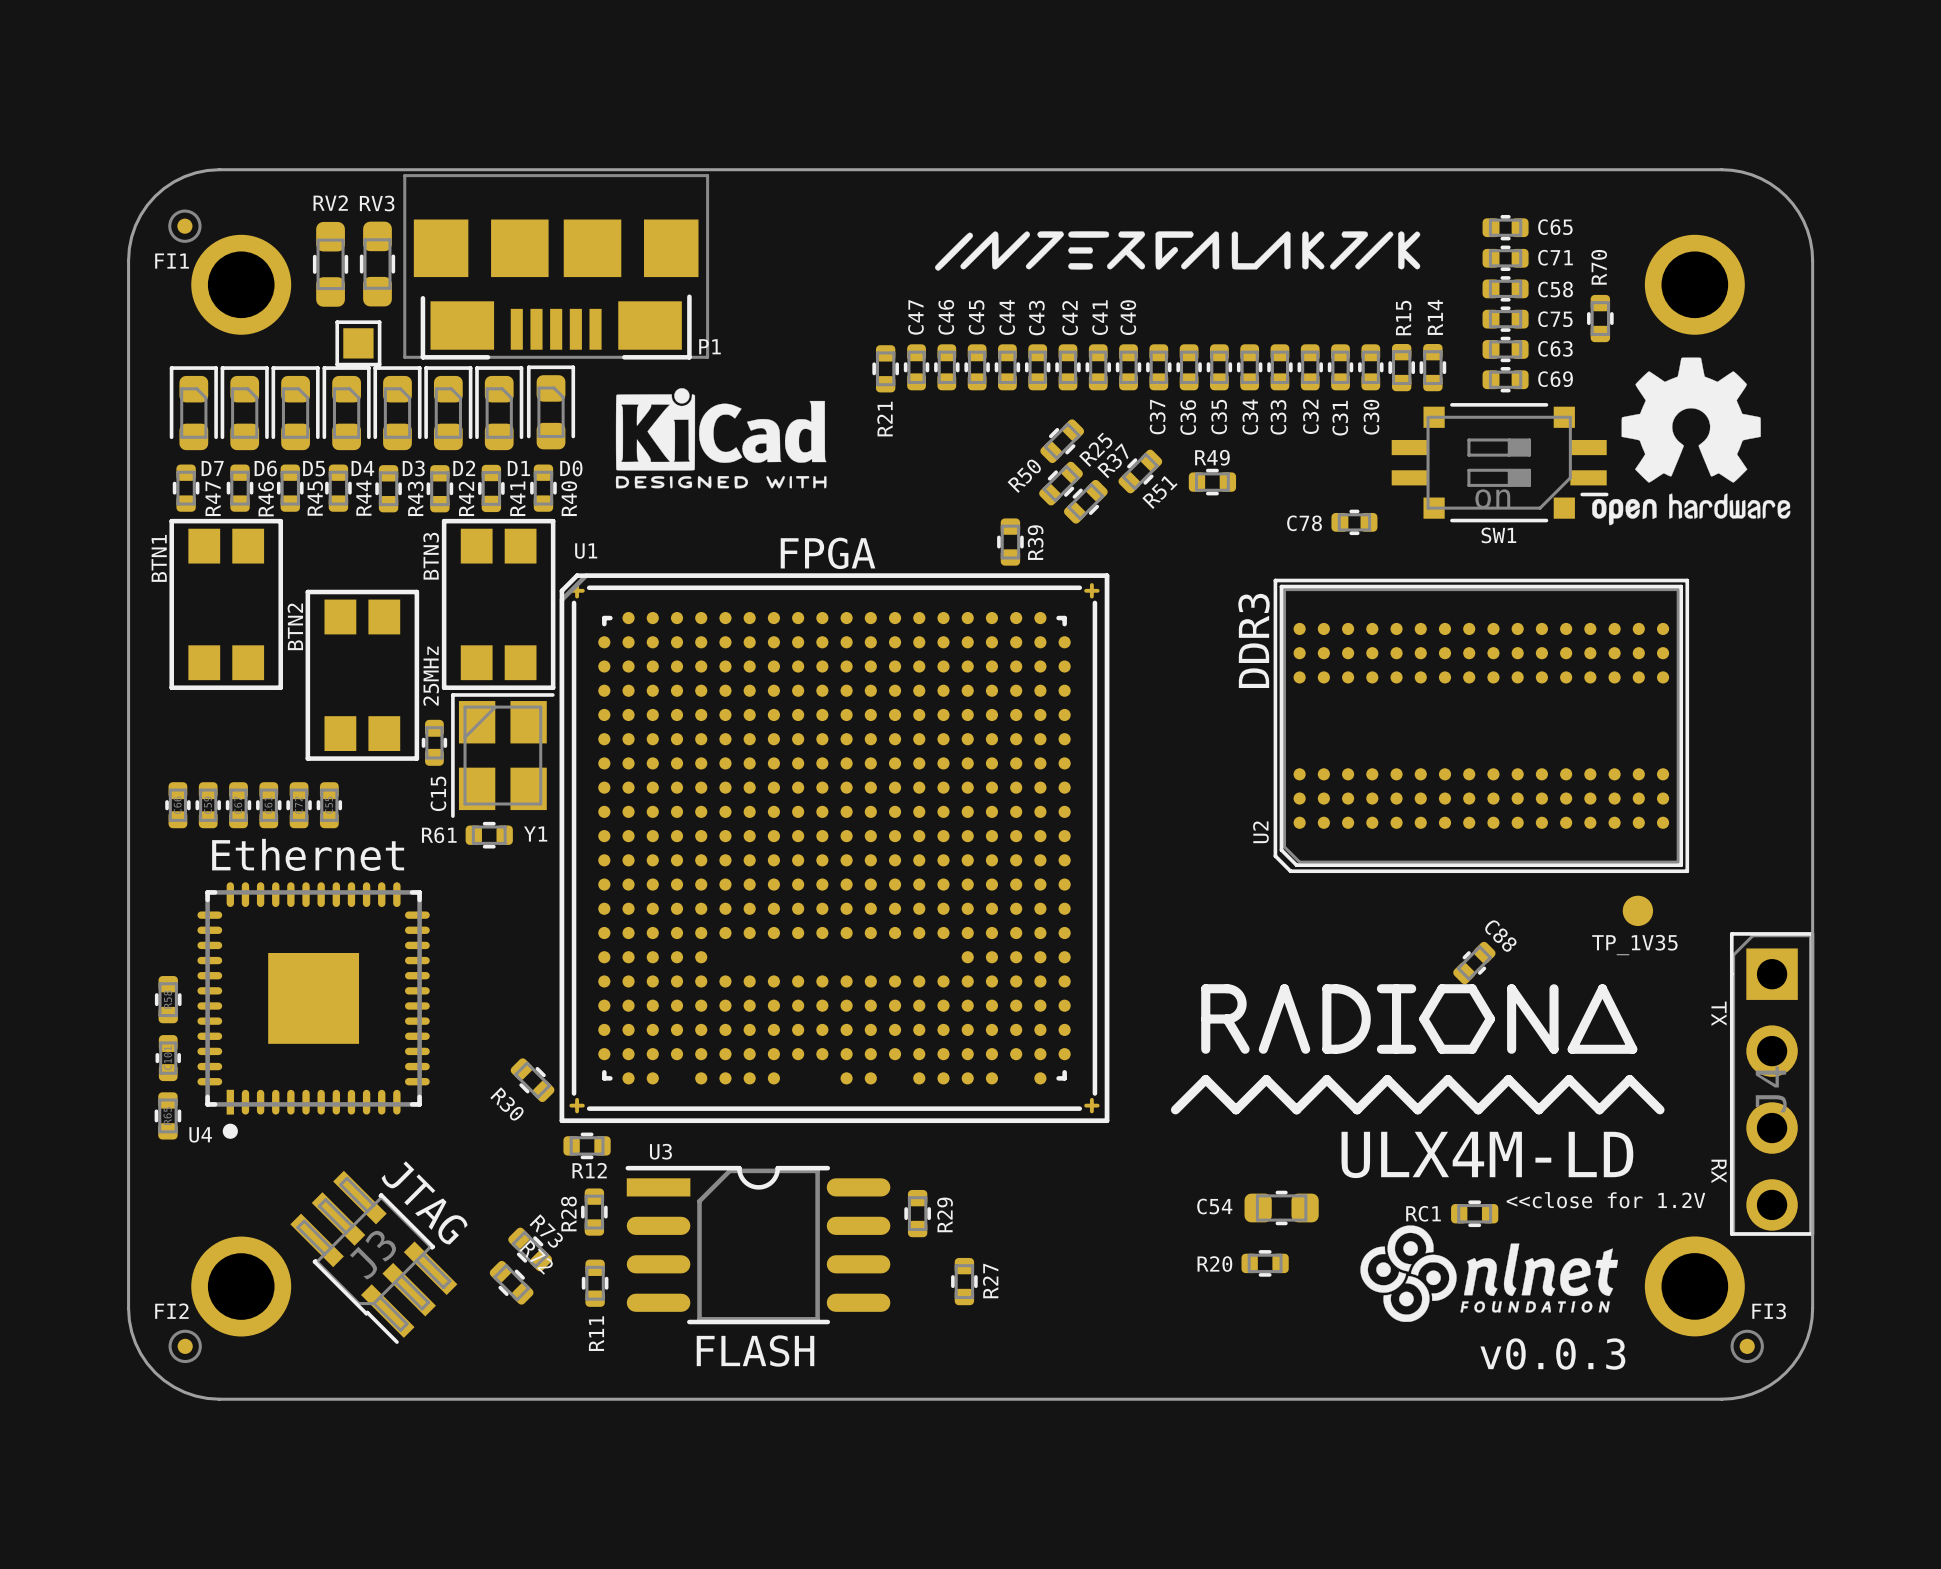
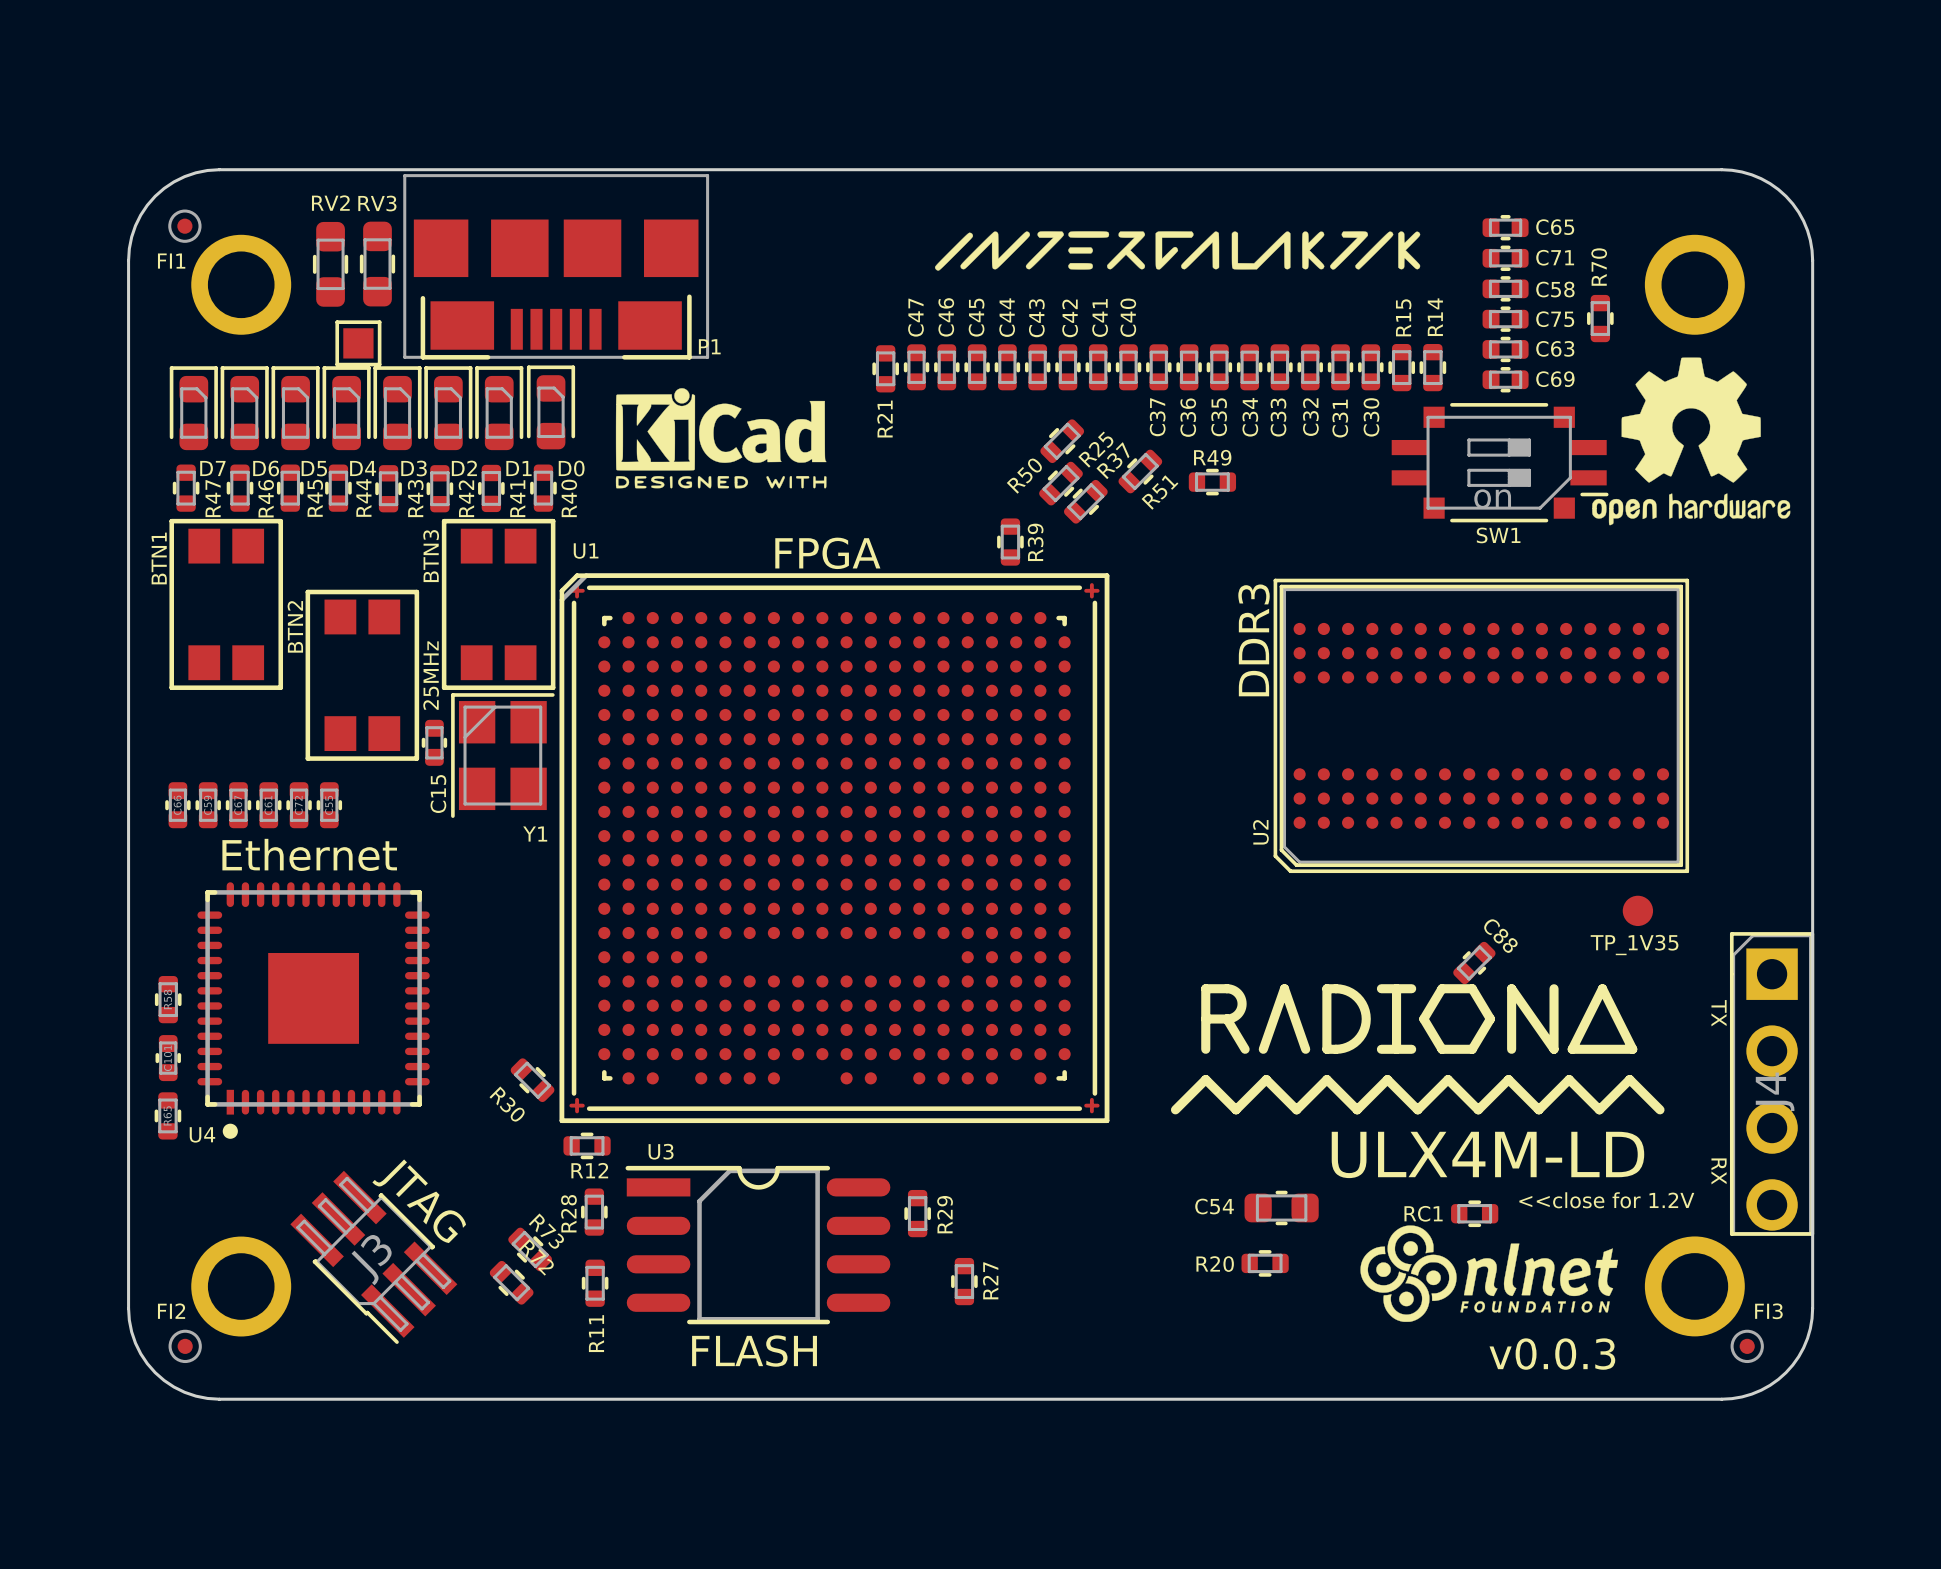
C78: (1354, 522) -> none
R61: (489, 835) -> none

